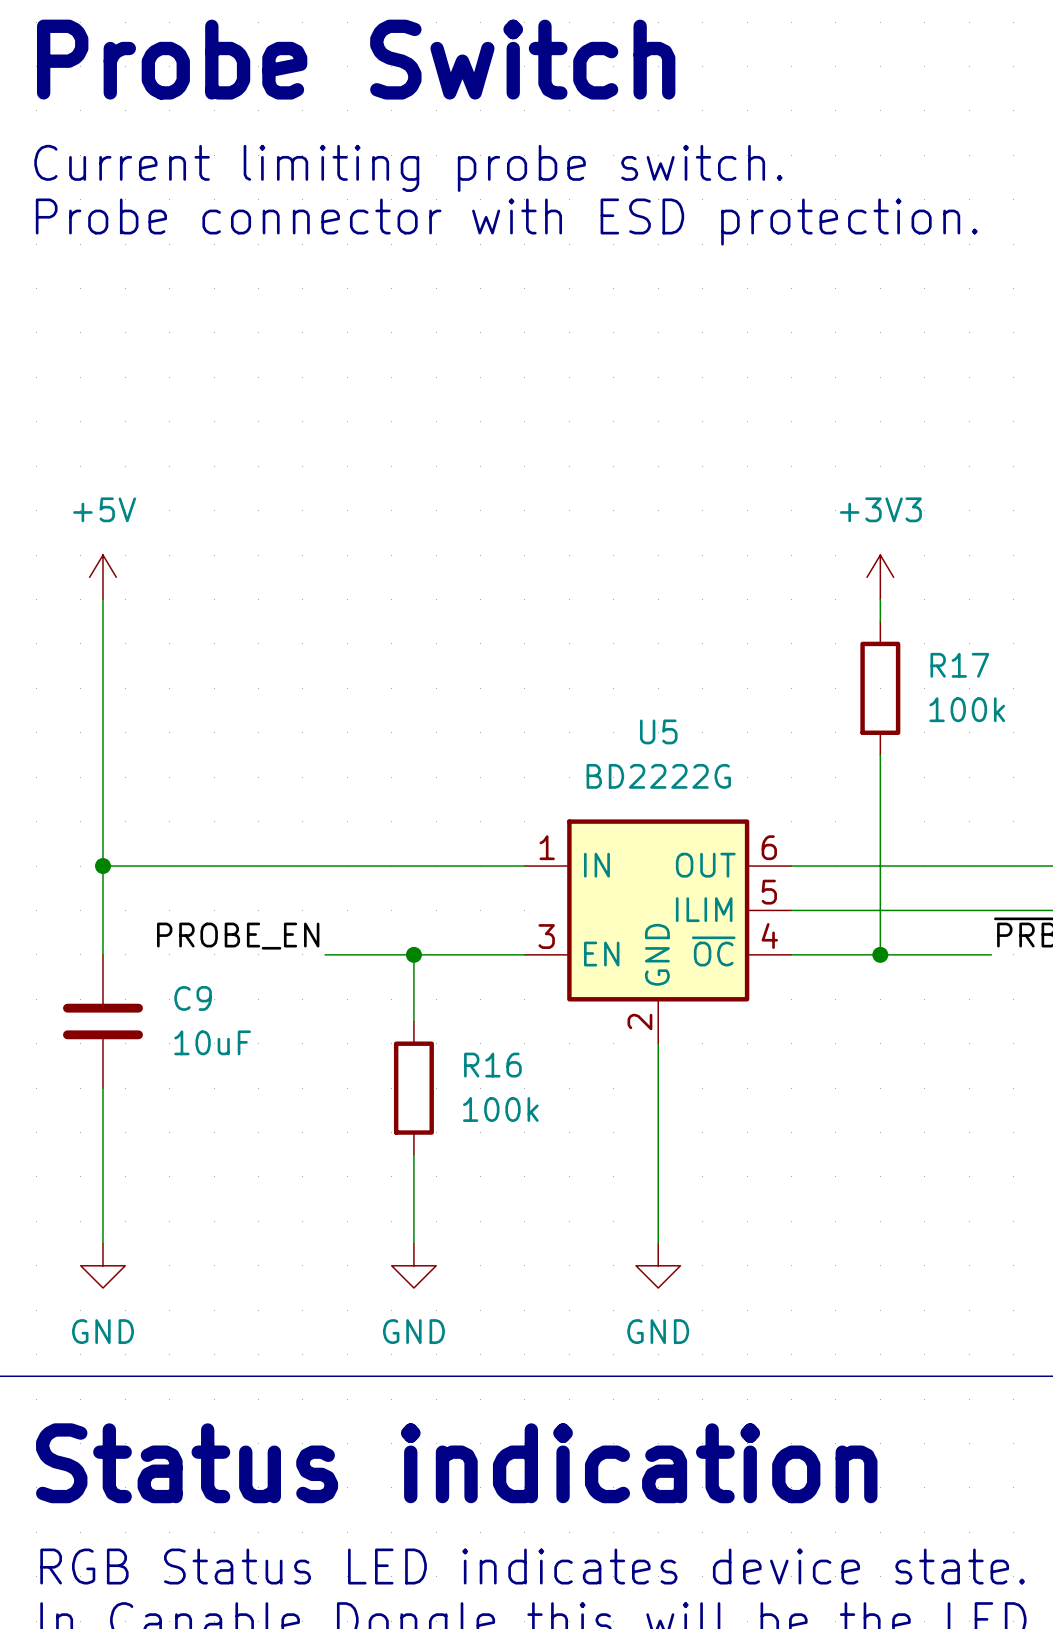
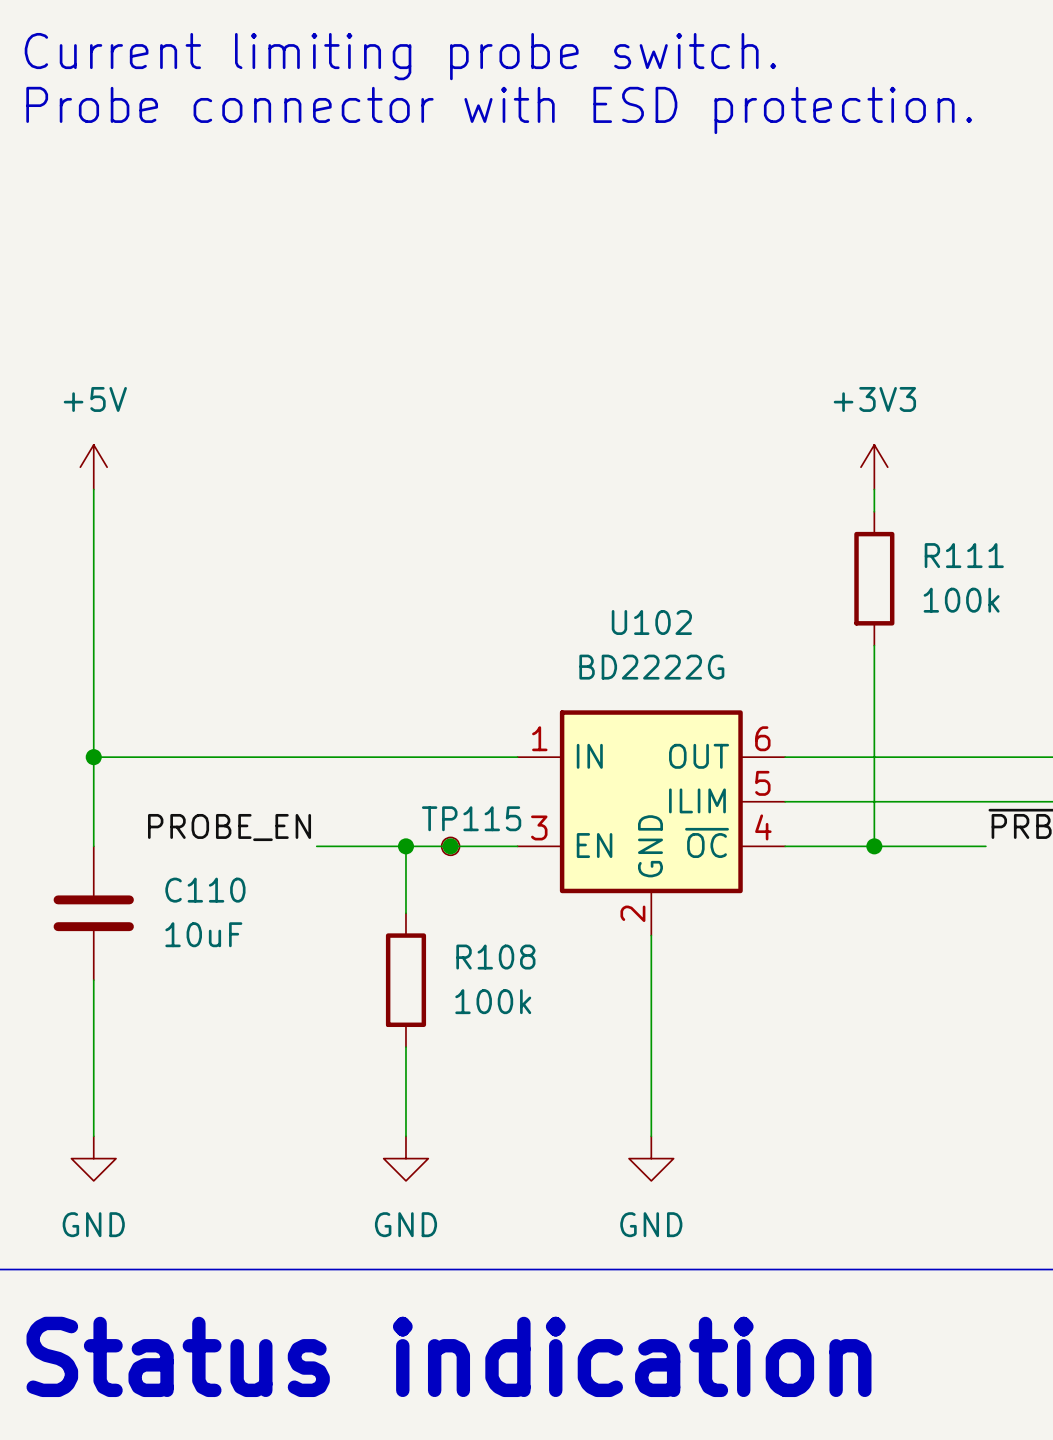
R17 name: R17 (959, 665) -> R111 (964, 555)
U5 name: U5 (658, 731) -> U102 (651, 622)
TP115: none -> (450, 846)
junction: none -> (450, 846)
C9 name: C9 (193, 998) -> C110 (205, 890)
R16 name: R16 (492, 1065) -> R108 (495, 957)

